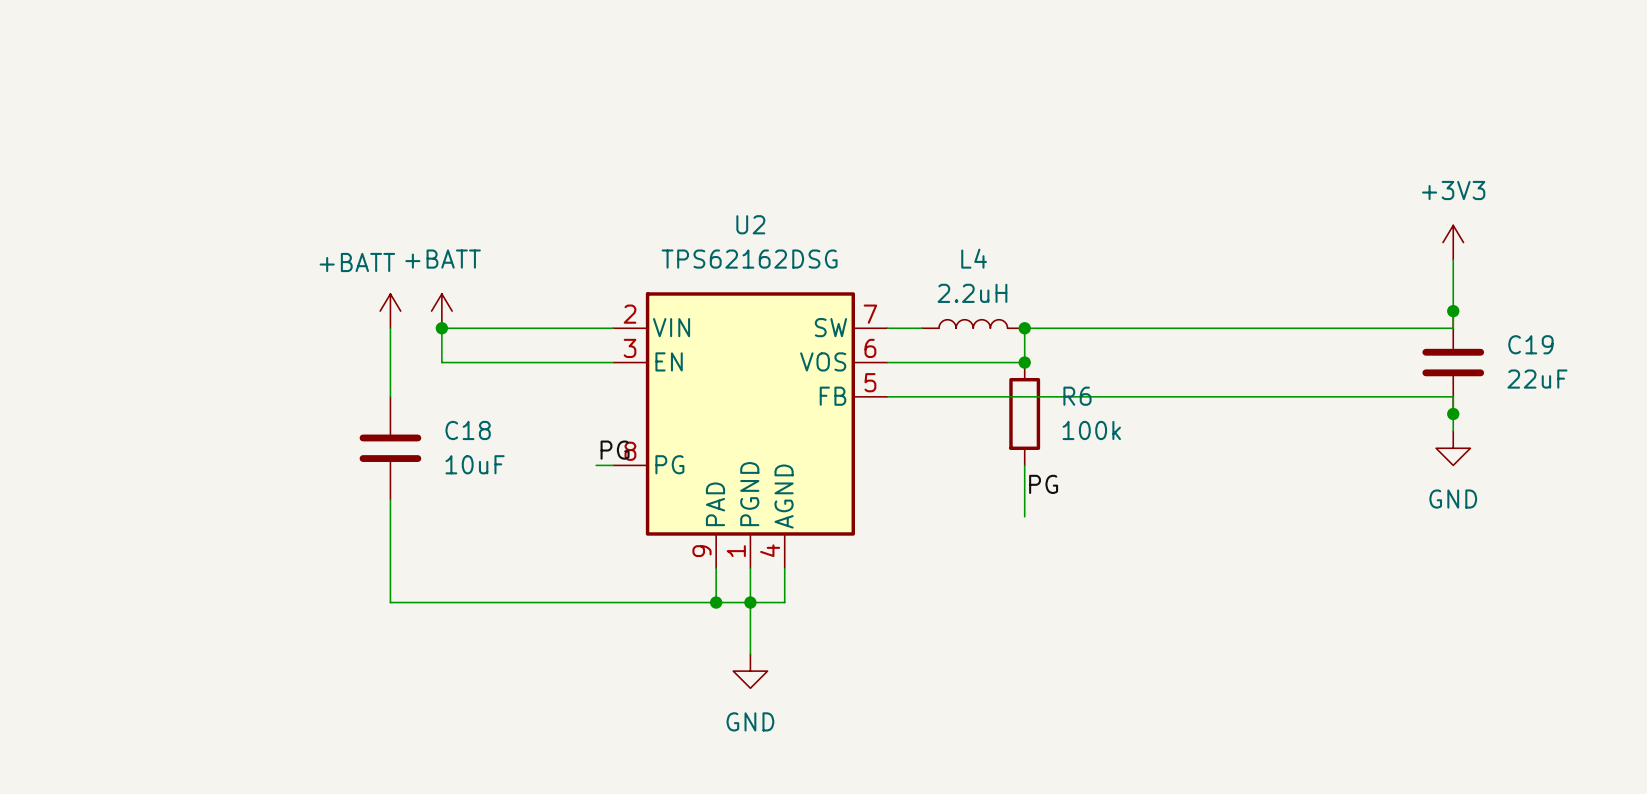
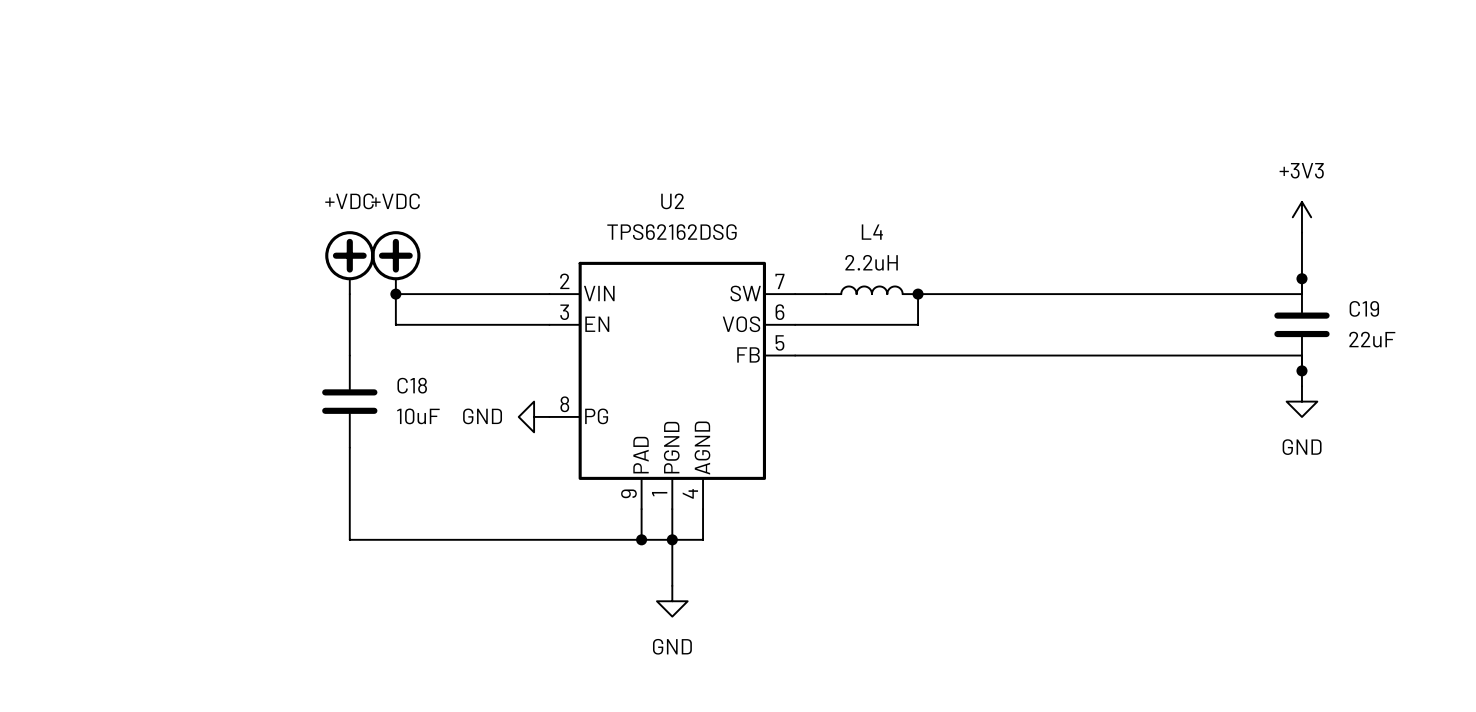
power symbol: none -> +VDC (349, 262)
power symbol: none -> +VDC (395, 262)
power symbol: +BATT (390, 311) -> none
power symbol: +BATT (441, 311) -> none
junction: (1024, 362) -> none
R6: 100k (1024, 413) -> none
label: PG (615, 450) -> none
power symbol: none -> GND (534, 416)
wire: (1024, 465) (1024, 516) -> none
label: PG (1043, 484) -> none

